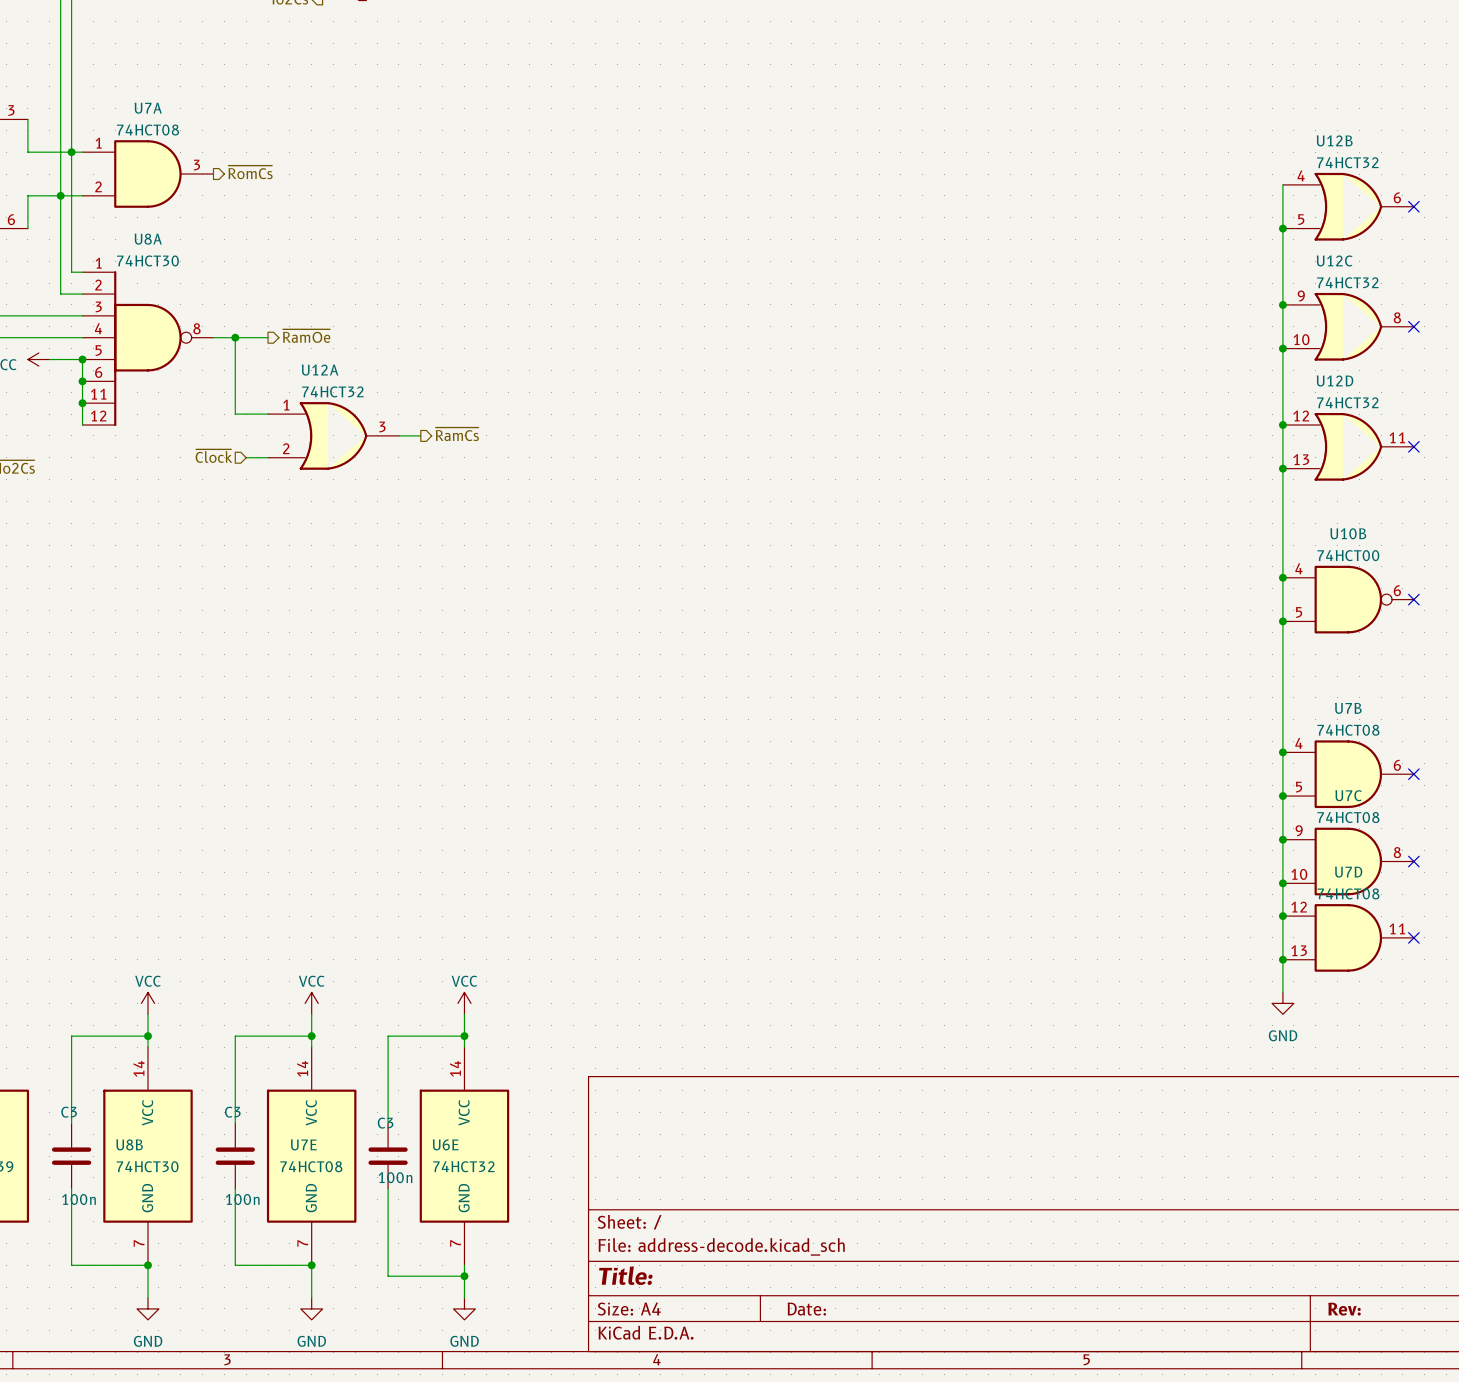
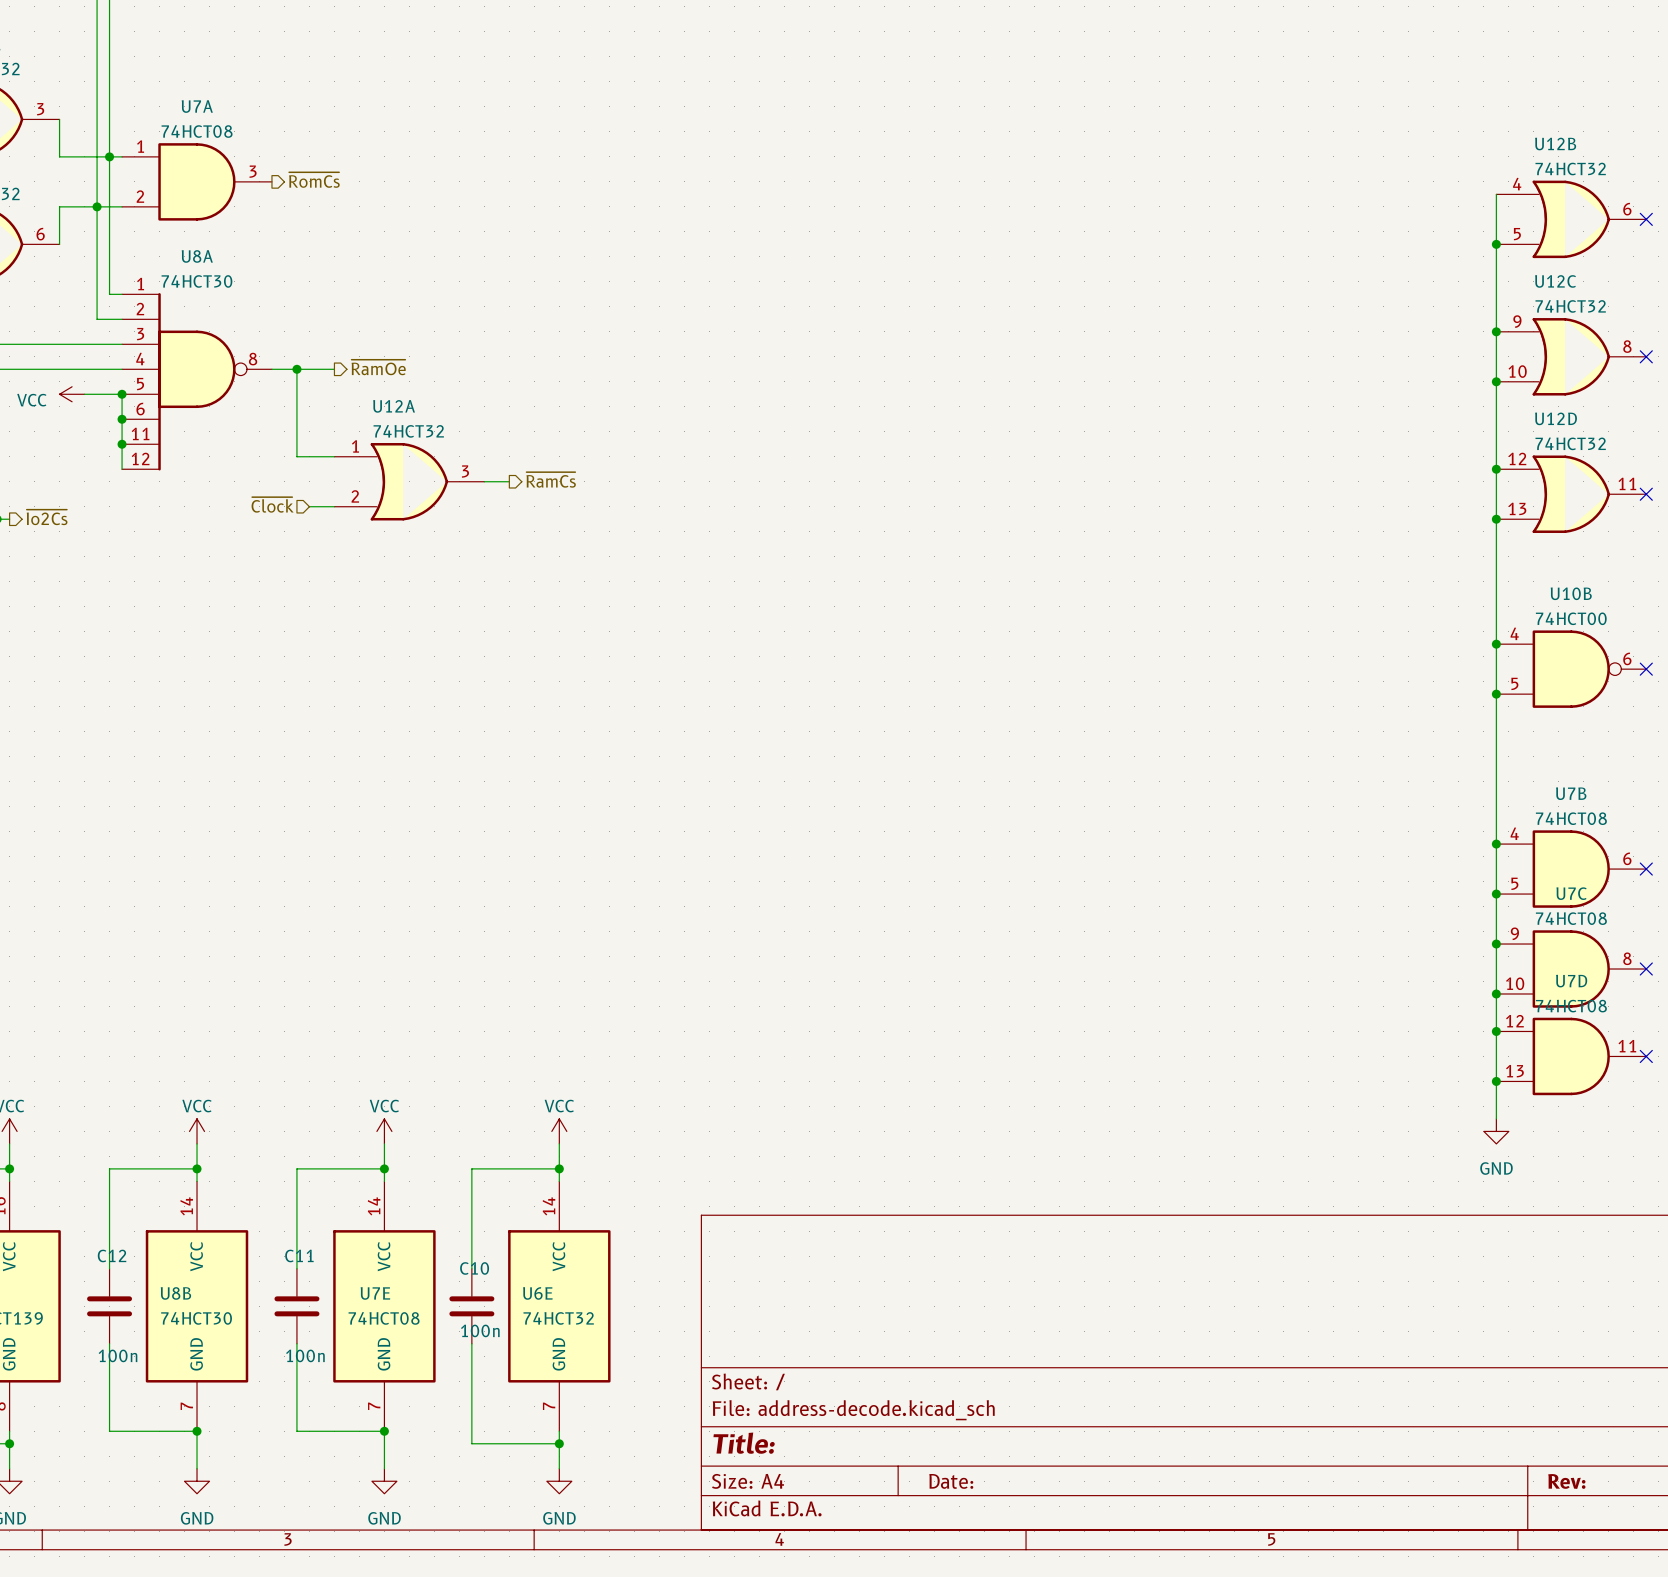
C3 name: C3 (69, 1112) -> C12 (112, 1255)
C3 name: C3 (232, 1112) -> C11 (299, 1255)
C3 name: C3 (385, 1123) -> C10 (474, 1268)

